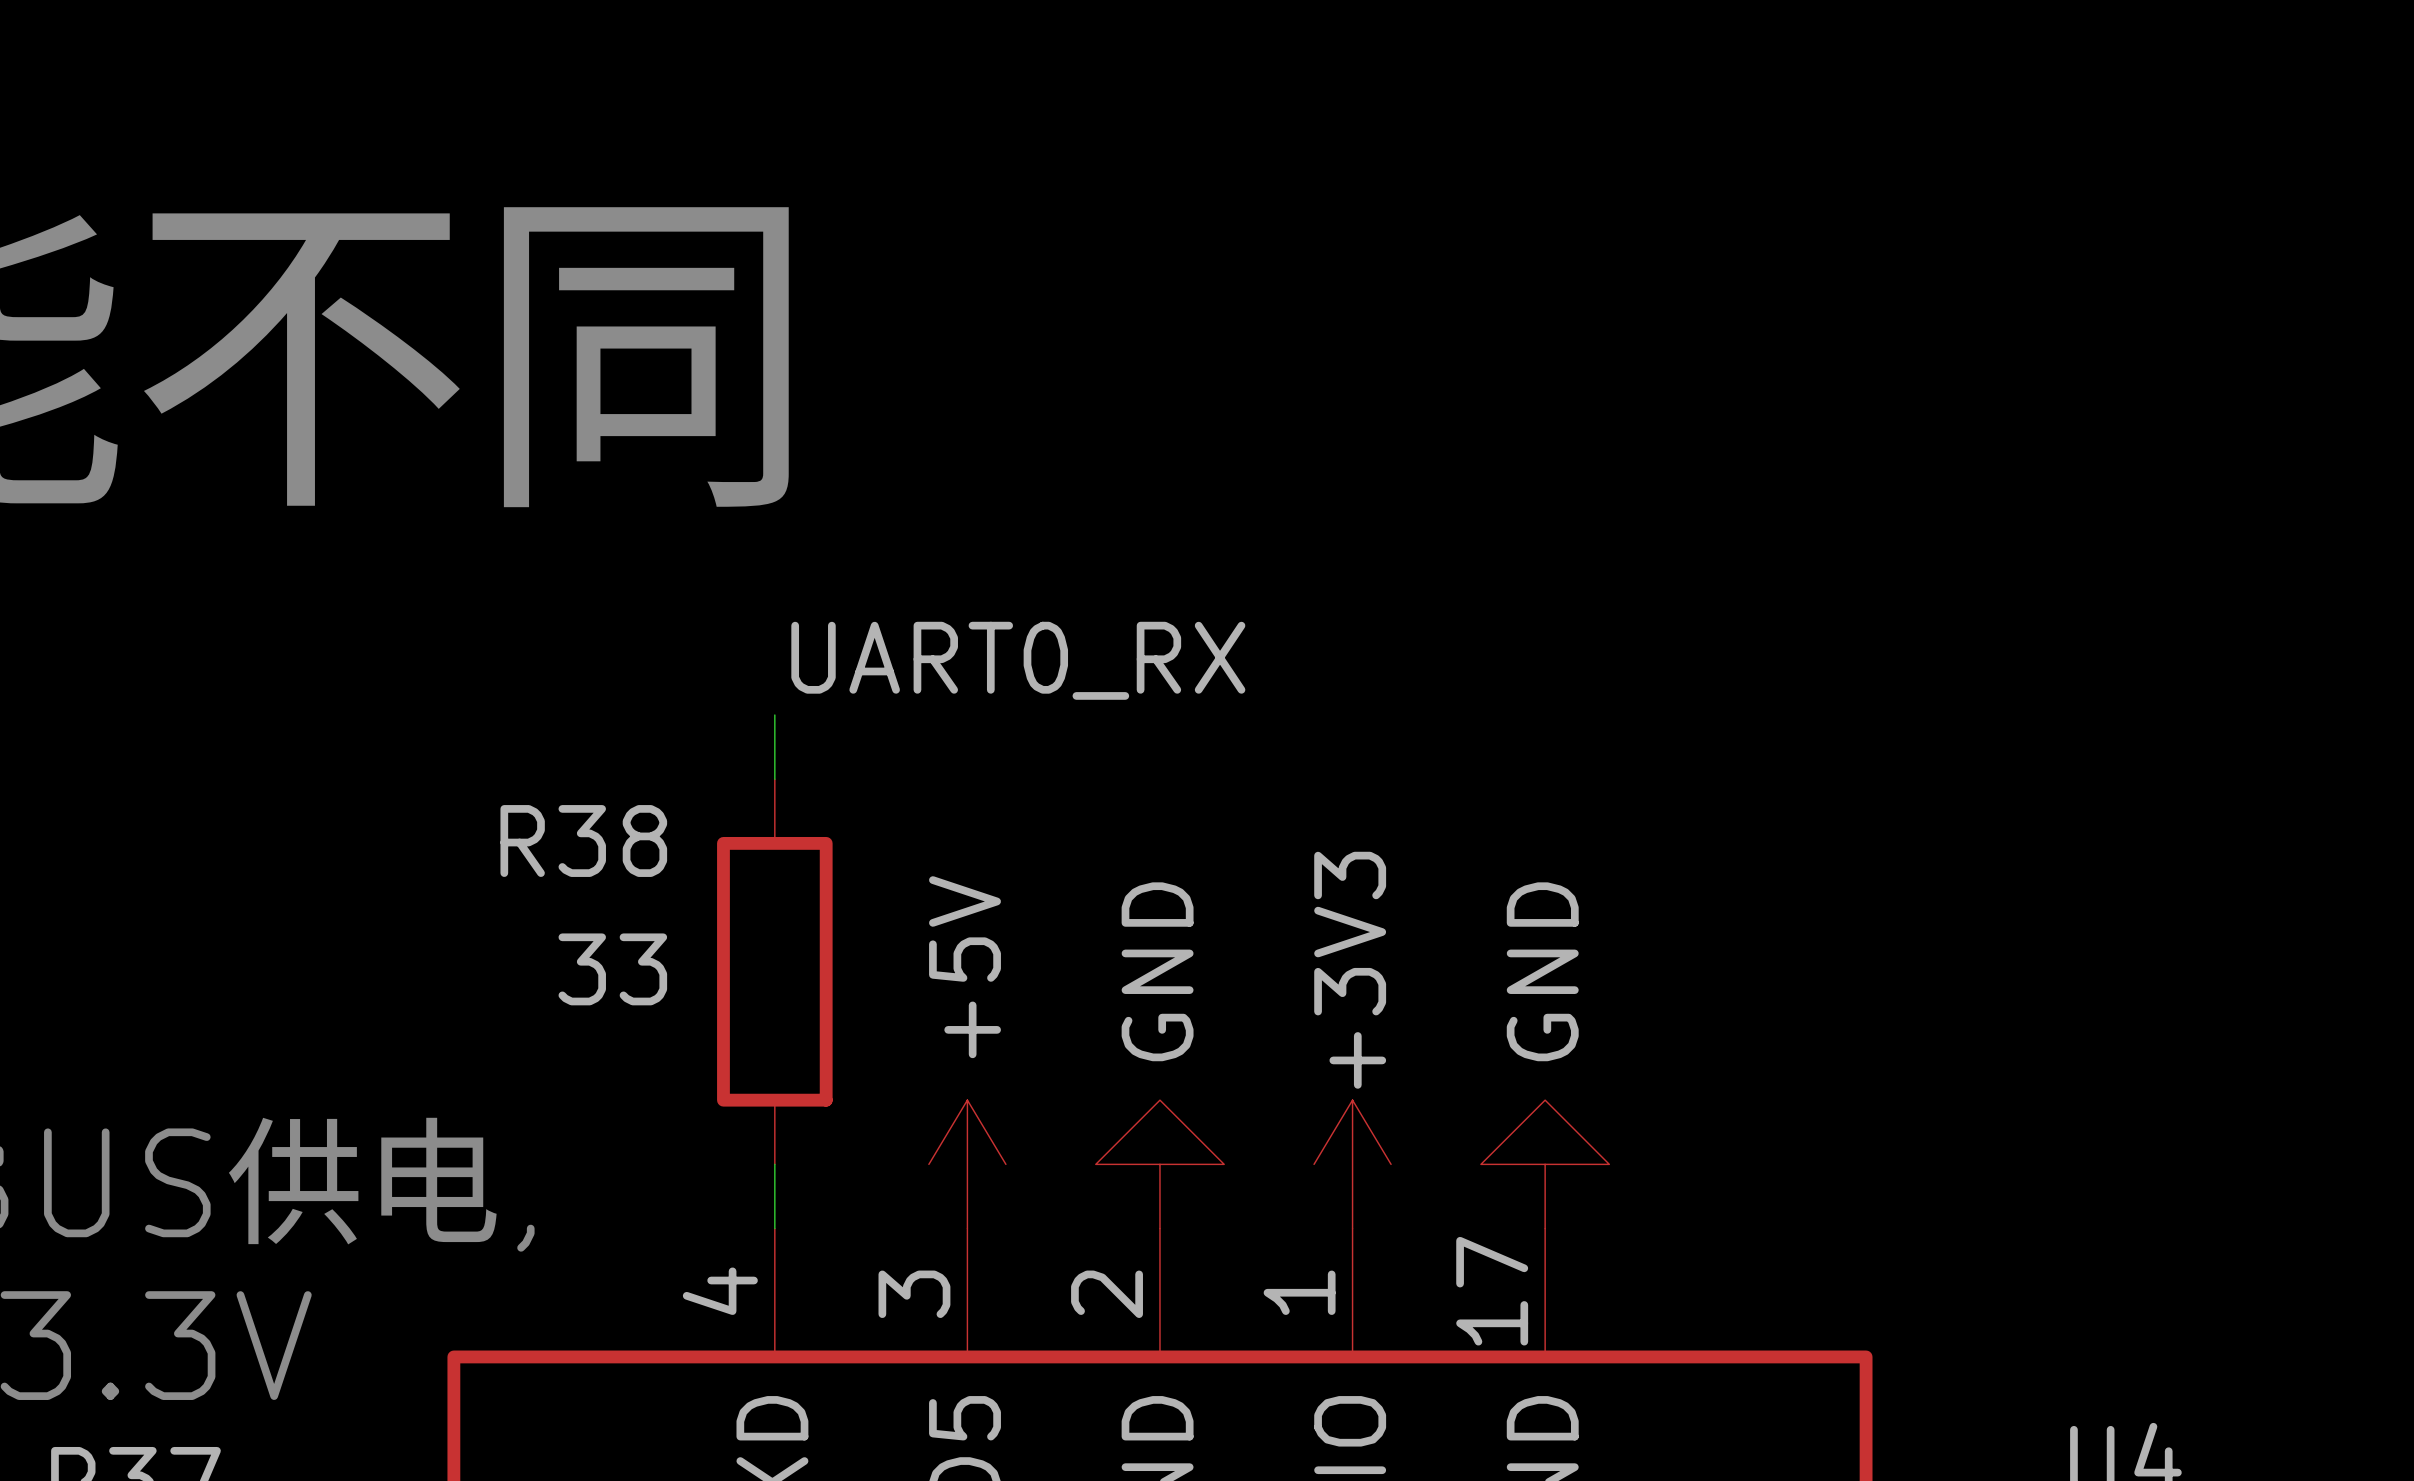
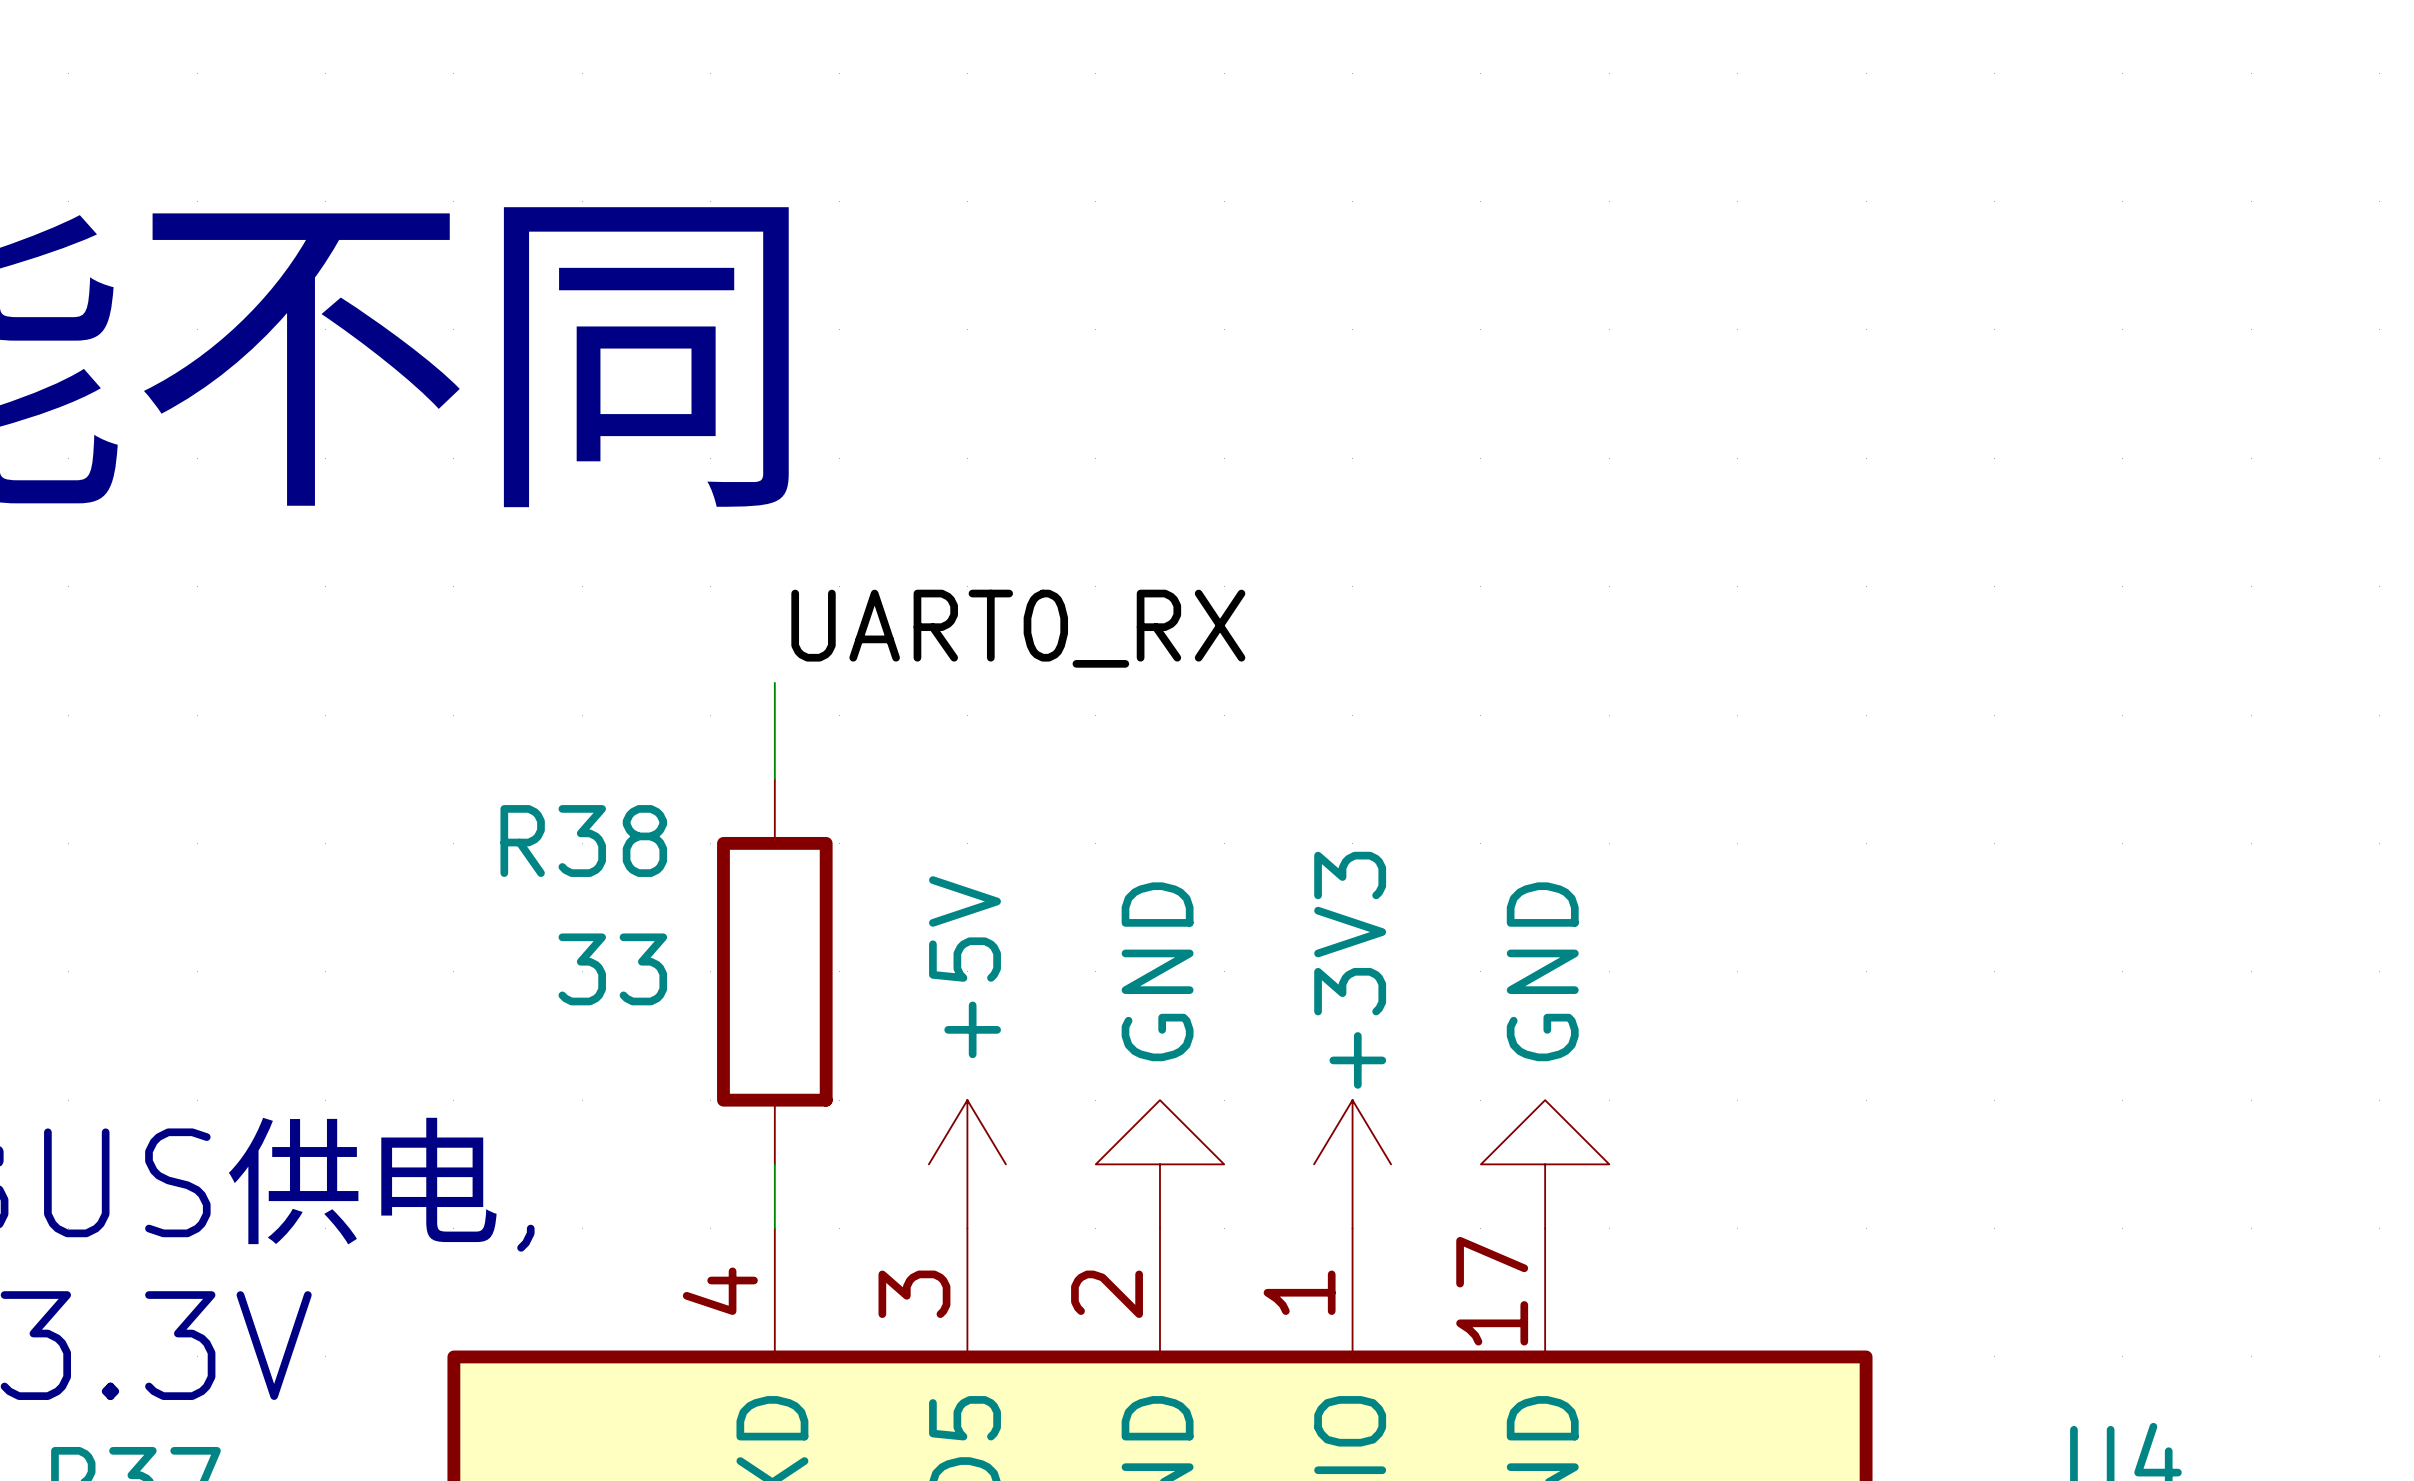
label position: UART0_RX (1018, 660) -> UART0_RX (1018, 628)
wire: none -> (774, 682) (774, 715)

